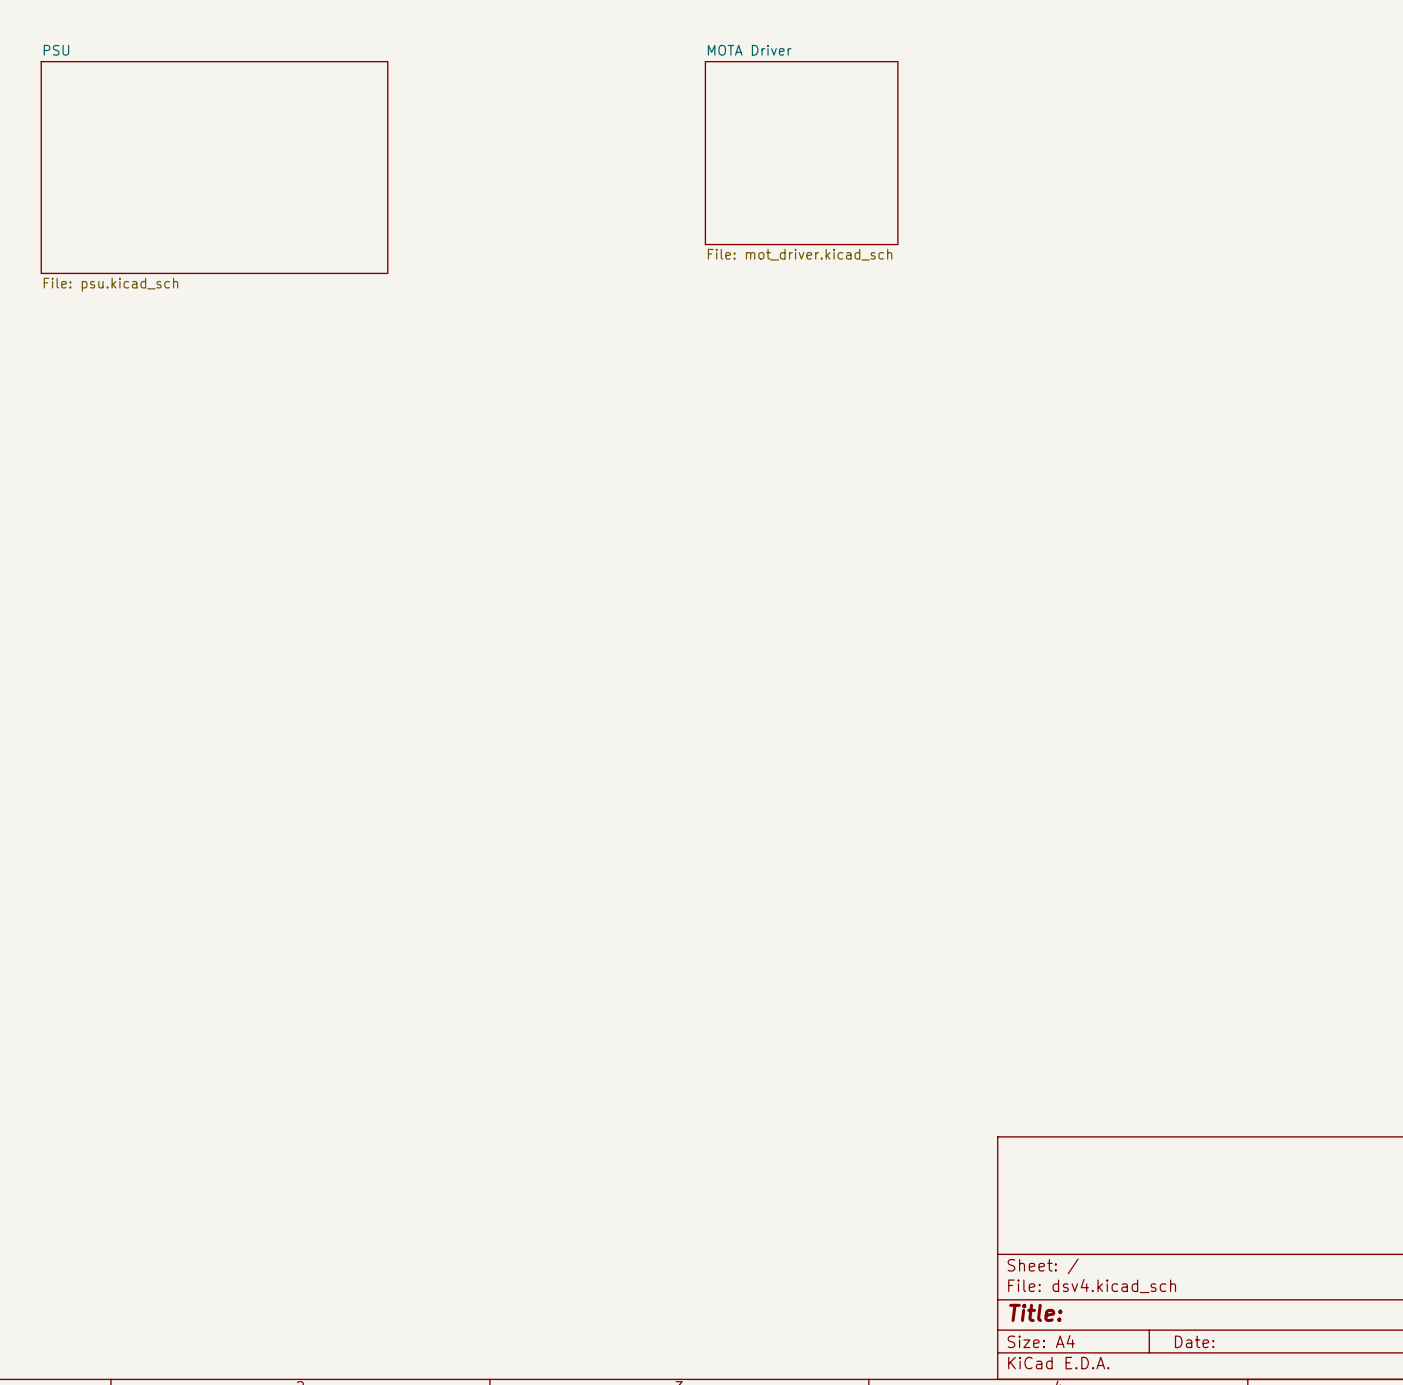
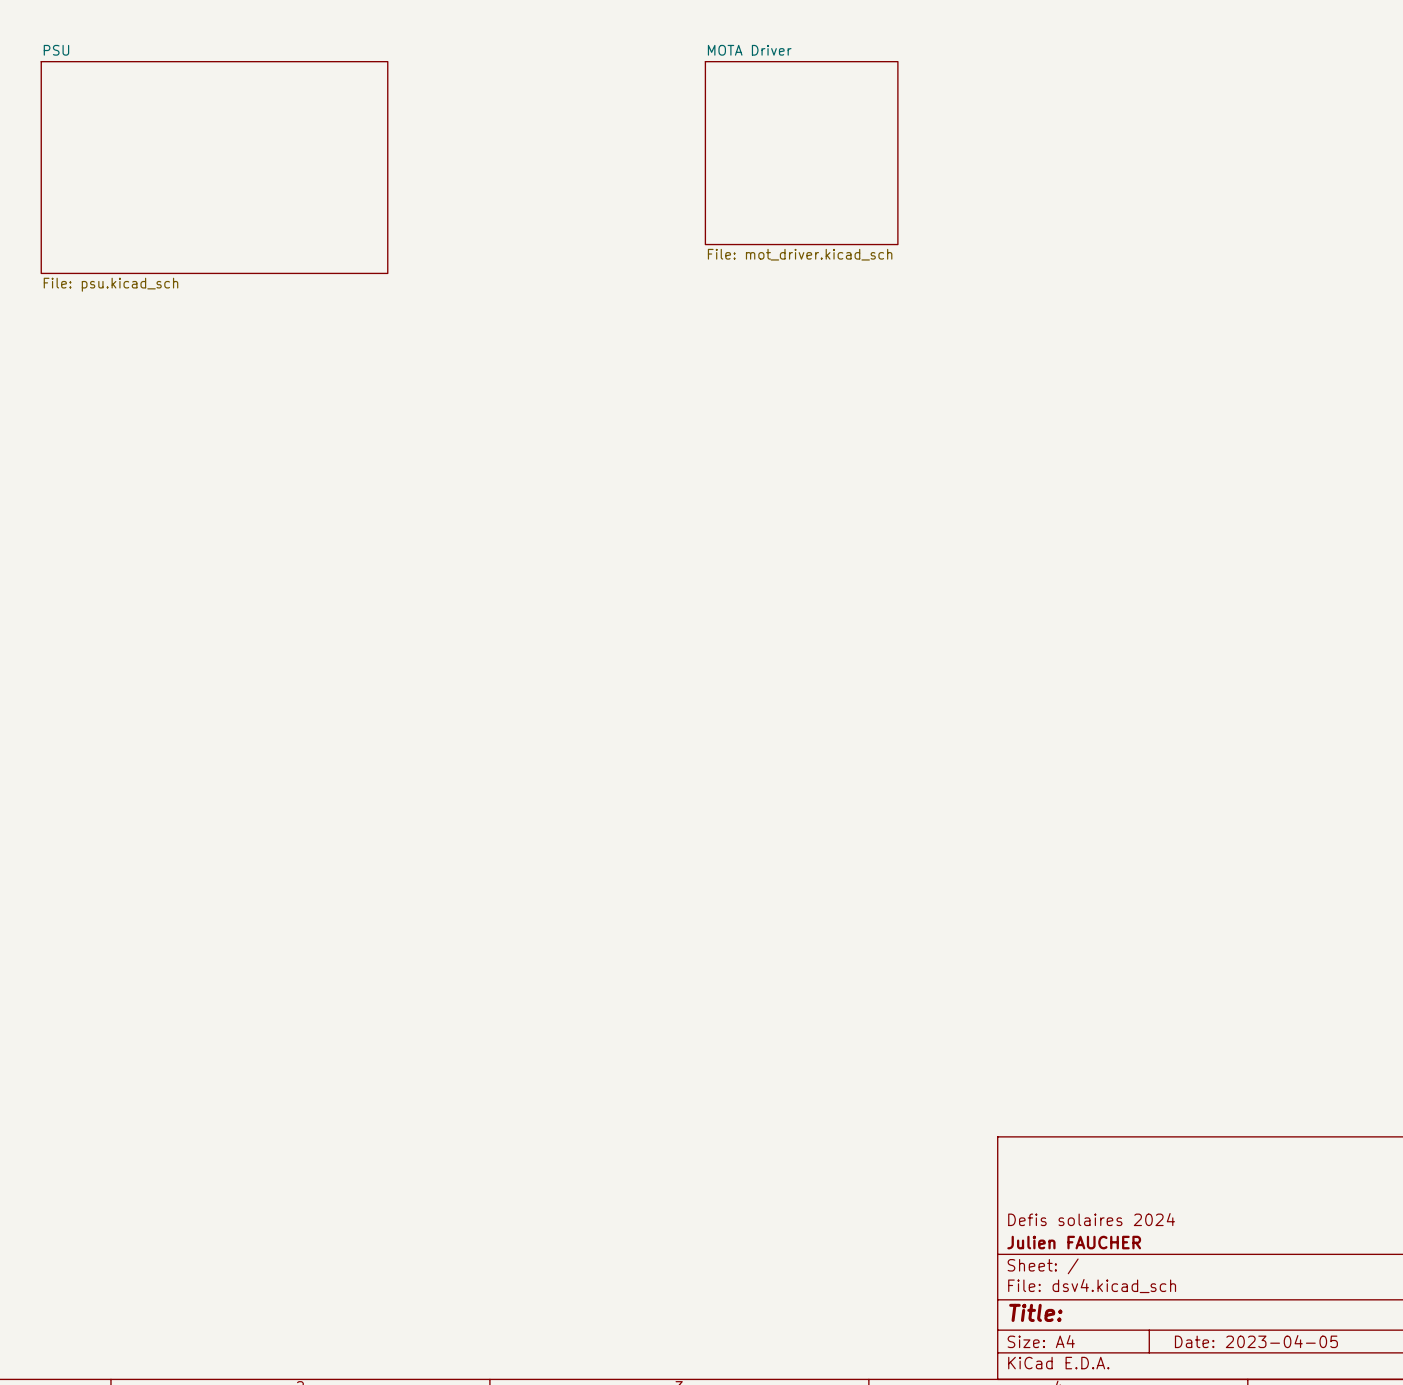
title block: none -> Defis solaires 2024 (1091, 1219)
title block: none -> Julien FAUCHER (1074, 1242)
title block: Date: (1194, 1341) -> Date: 2023-04-05 (1256, 1341)

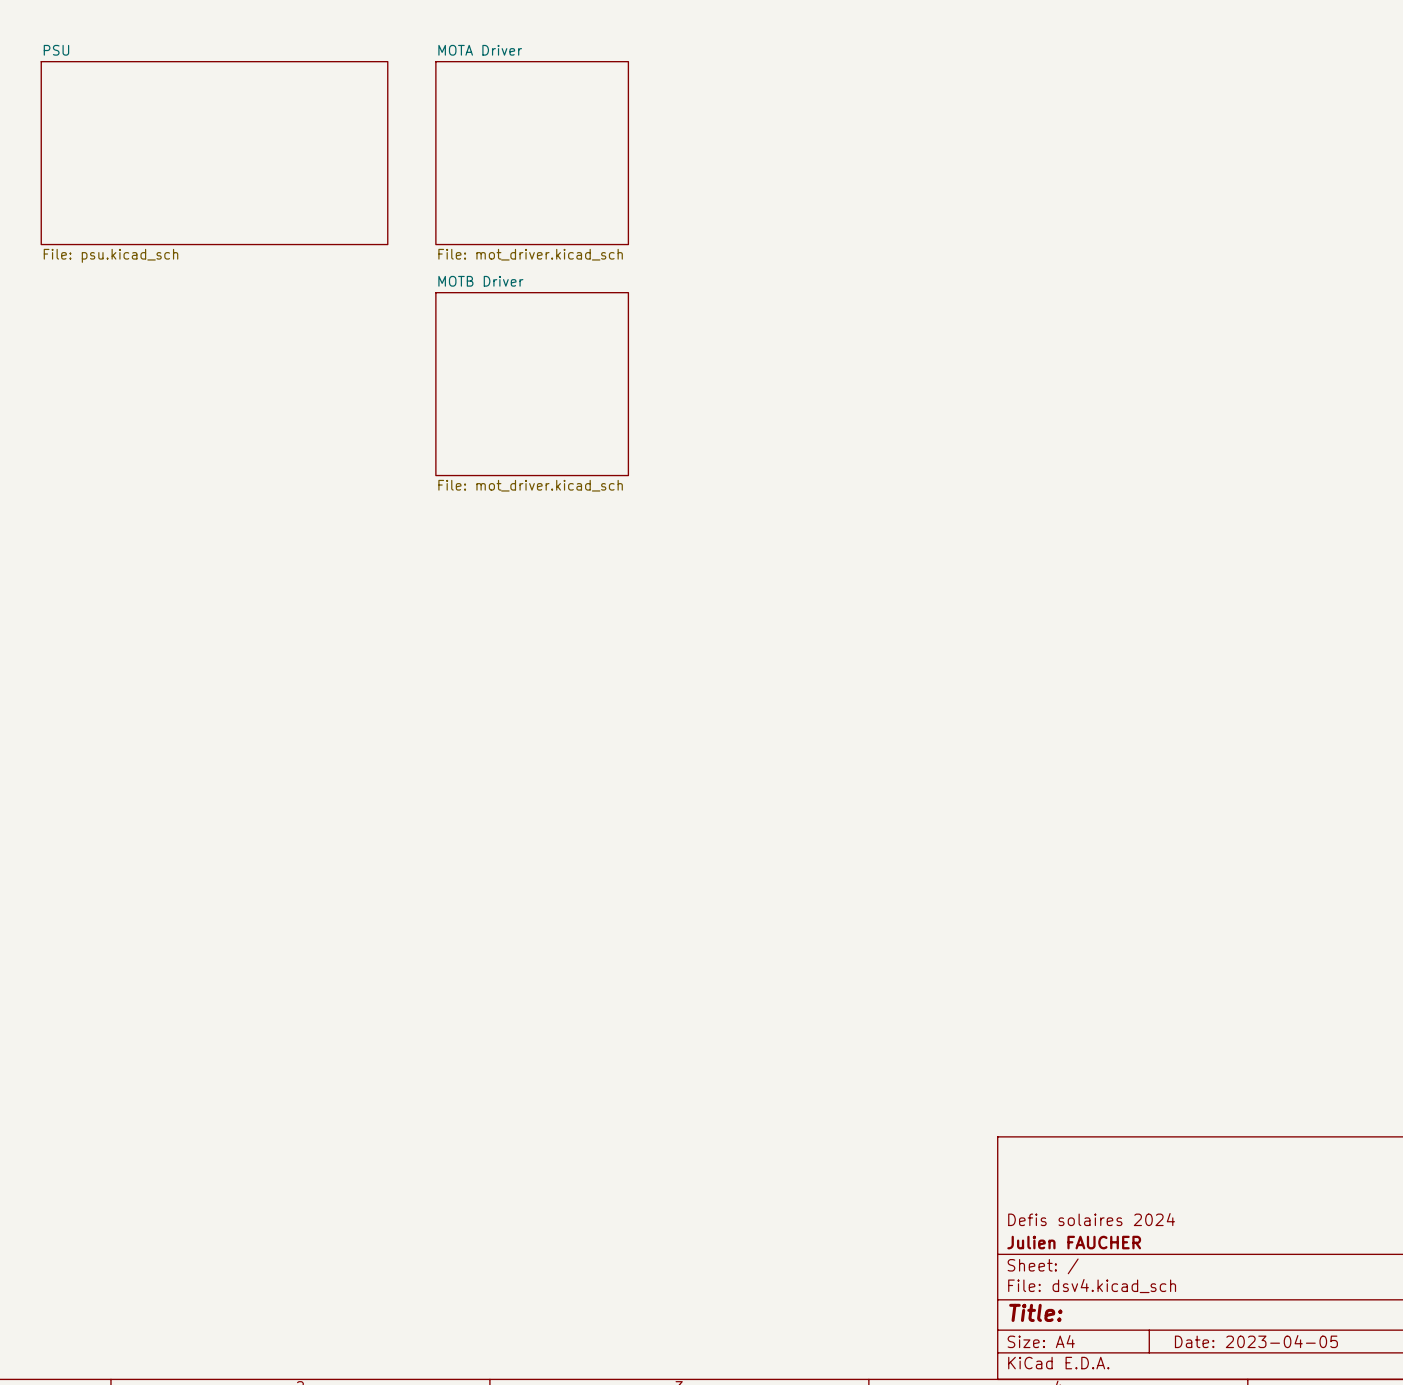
sheet PSU: none -> File: psu.kicad_sch (214, 153)
sheet MOTA Driver: none -> File: mot_driver.kicad_sch (532, 153)
sheet MOTA Driver: File: mot_driver.kicad_sch (801, 153) -> none
sheet PSU: File: psu.kicad_sch (214, 167) -> none
sheet MOTB Driver: none -> File: mot_driver.kicad_sch (532, 384)

